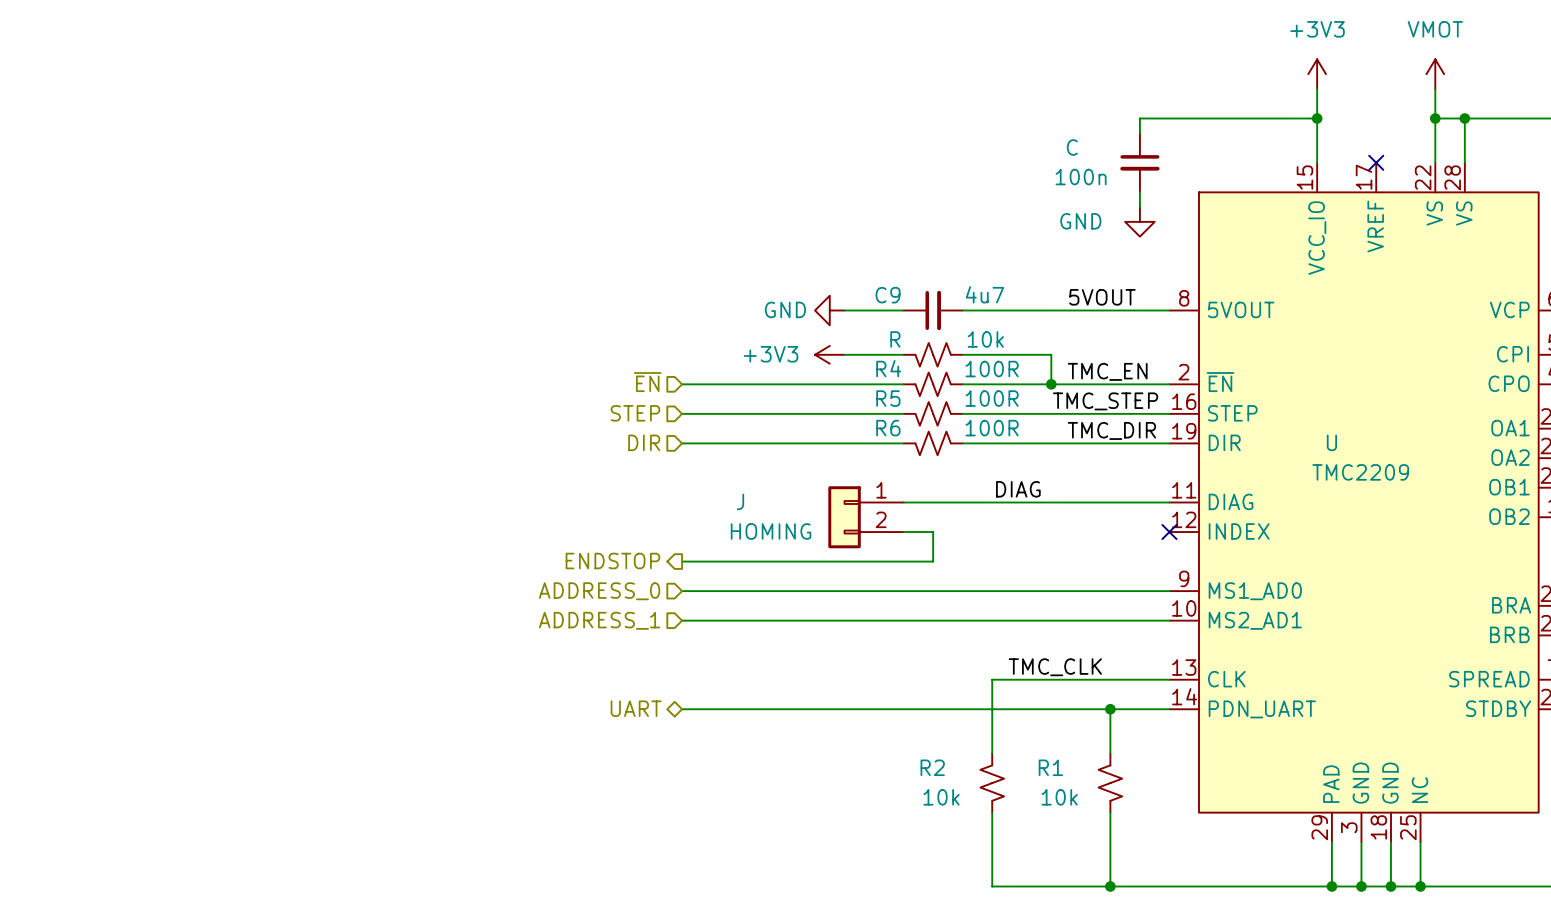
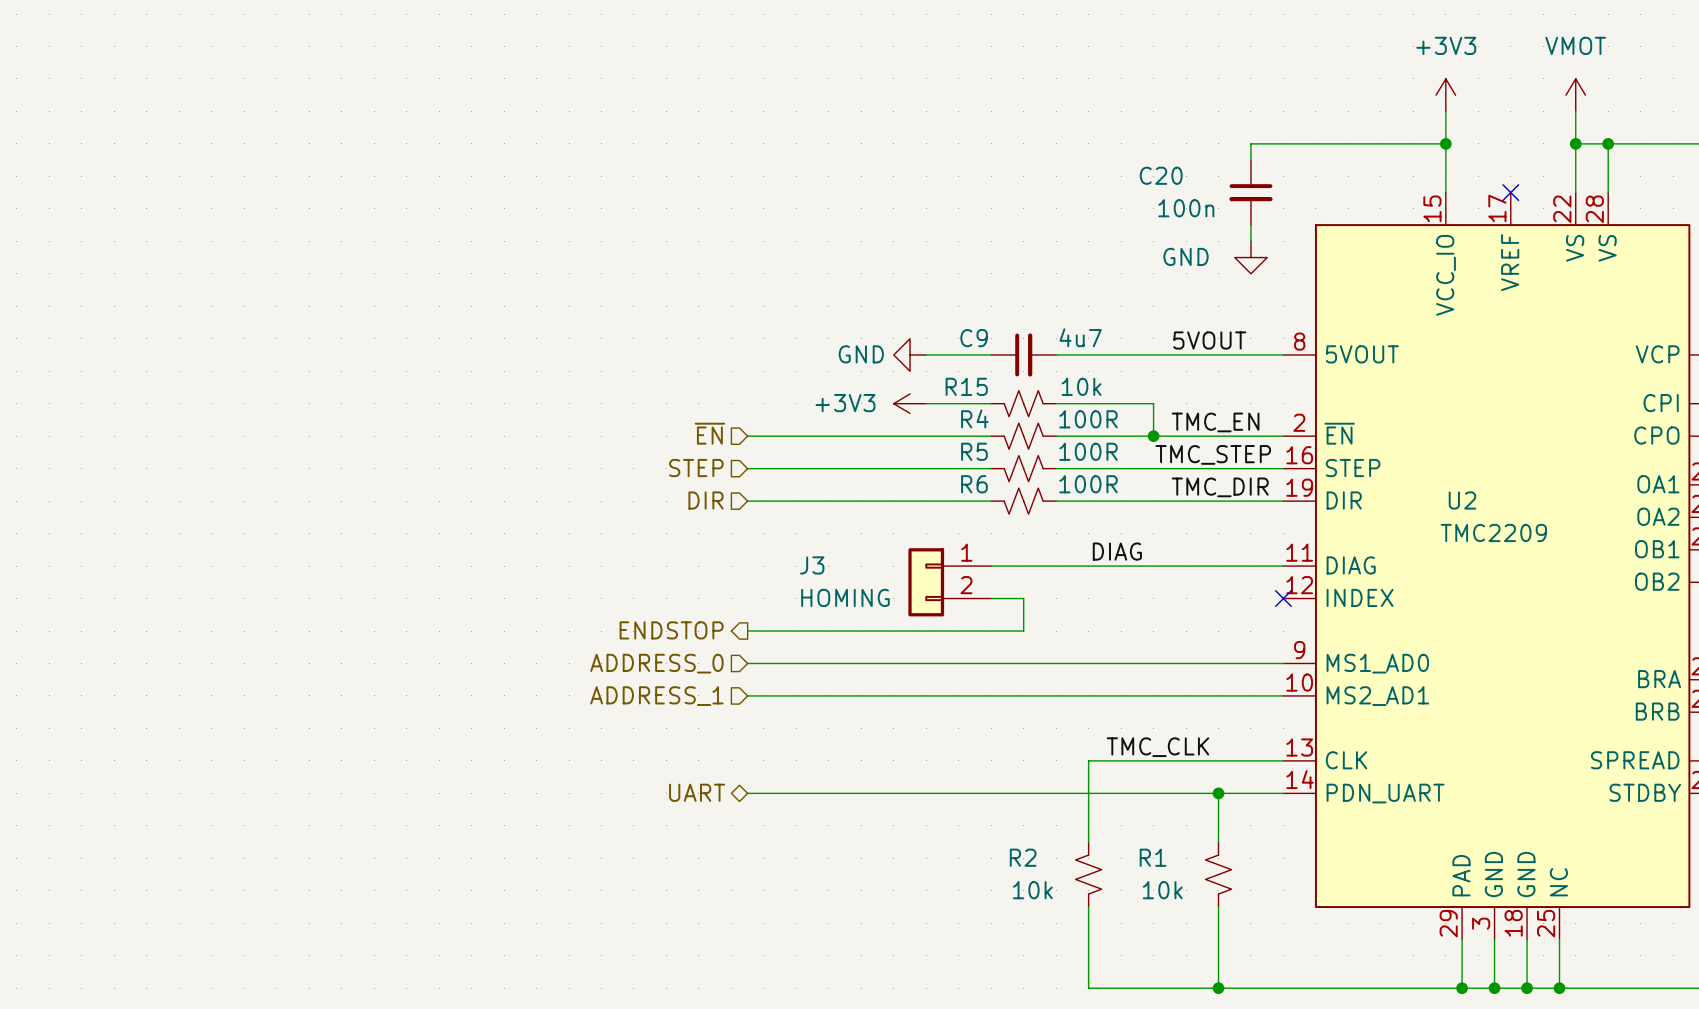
C name: C (1072, 147) -> C20 (1161, 175)
R name: R (895, 339) -> R15 (966, 386)
U name: U (1331, 442) -> U2 (1462, 500)
J name: J (740, 501) -> J3 (812, 565)

